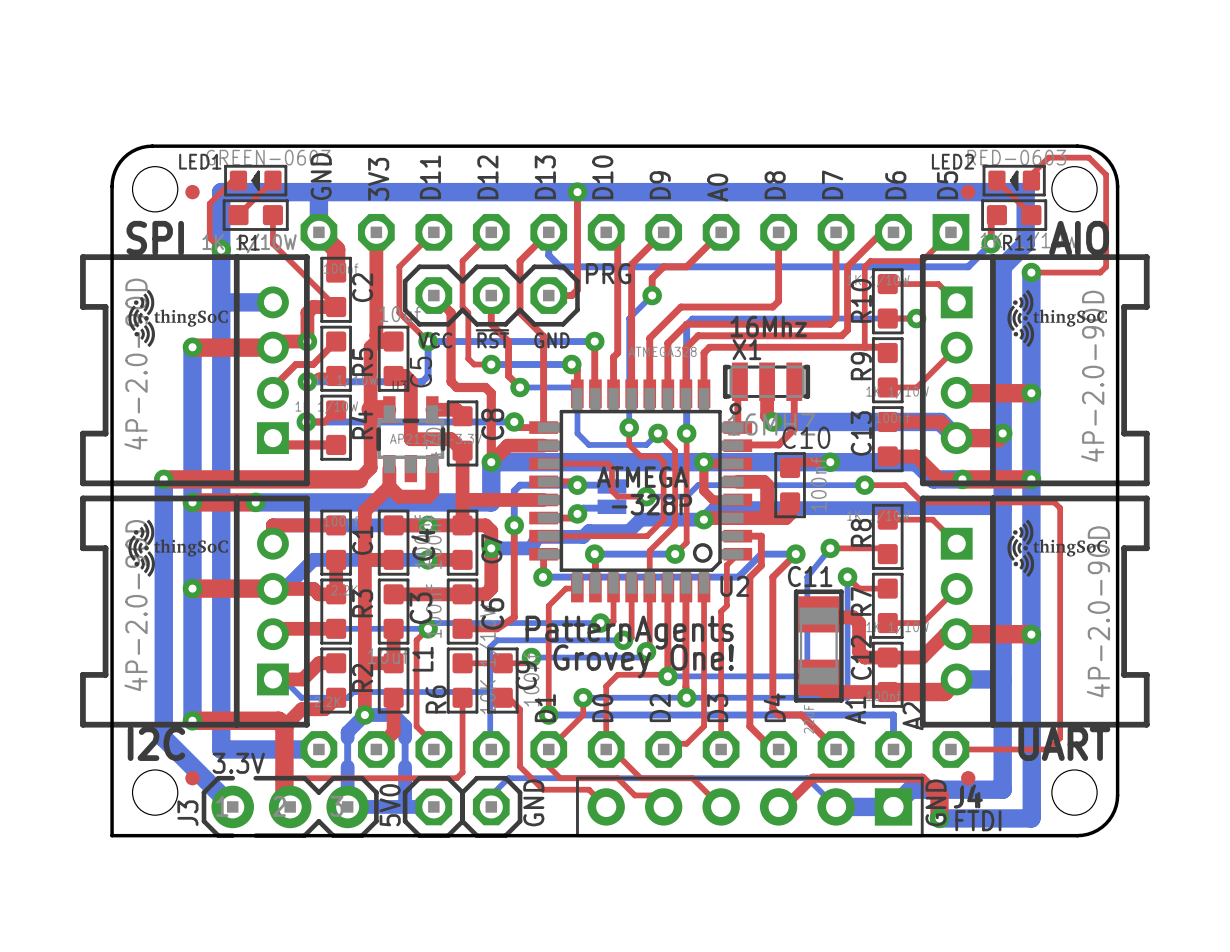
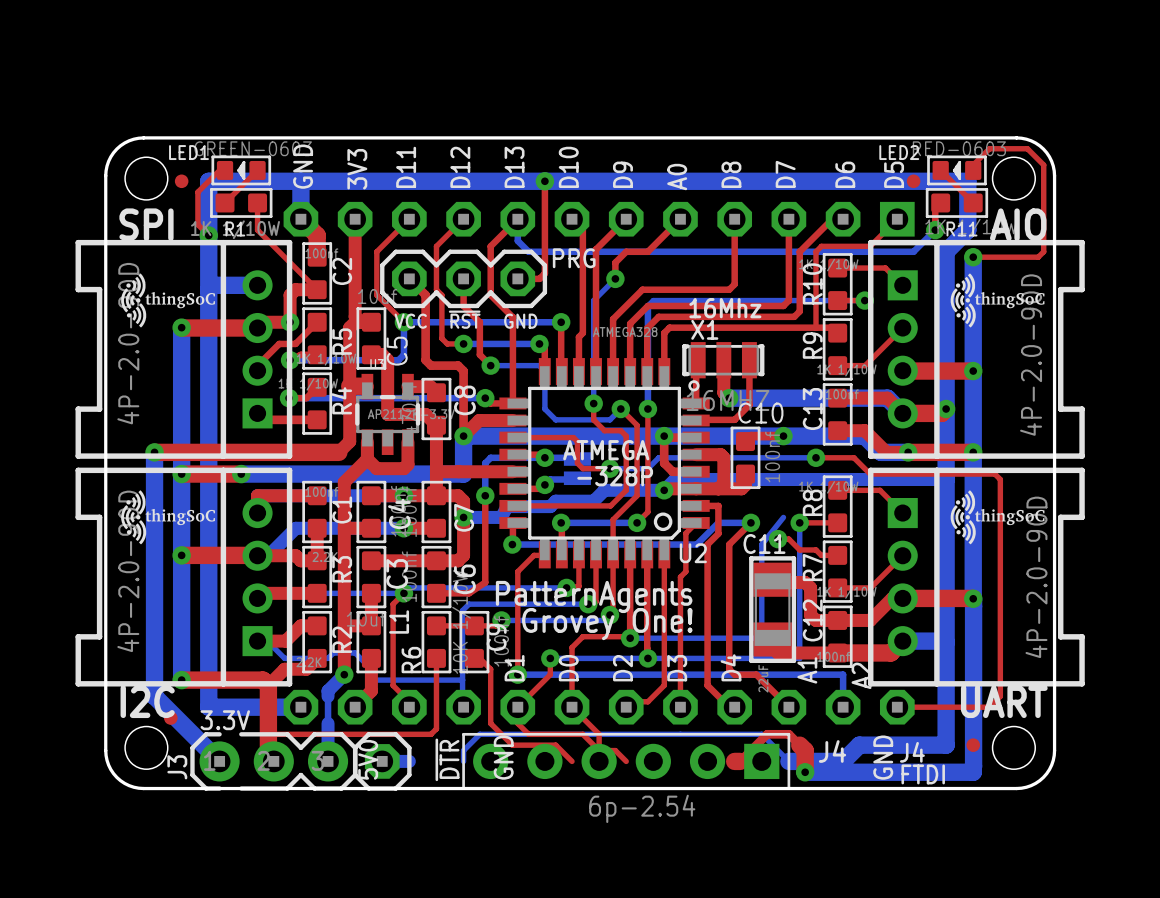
part footprint: [110, 144, 1120, 838] -> [104, 136, 1057, 791]
top track: (830, 548) (882, 548) (887, 554) -> (799, 522) (837, 522)
via position: (830, 548) -> (799, 522)
bottom track: none -> (799, 522) (799, 544)
via: none -> (778, 539)
top track: (847, 577) (859, 588) (870, 588) -> (778, 539) (788, 539) (799, 549) (816, 549) (821, 555)
via: (847, 577) -> none
bottom track: (376, 692) (490, 692) -> (355, 652) (371, 669) (371, 680) (462, 680)
bottom track: (364, 715) (393, 715) (405, 726) (405, 806) (347, 806) -> none
top track: (606, 749) (611, 749) (640, 778) (692, 778) (721, 806) -> (572, 707) (599, 734) (599, 761)
part position: (192, 778) -> (170, 718)
top track: (836, 778) (922, 778) (939, 795) (939, 818) -> (788, 734) (805, 750) (805, 772)
part position: (968, 778) -> (973, 745)
text: none -> ~{DTR} (447, 759)
part position: (433, 806) -> (382, 761)
part: (491, 806) -> none
J4 position: (749, 806) -> (626, 761)
bottom track: none -> (805, 772) (886, 772)
via position: (939, 818) -> (805, 772)
J4 value: none -> 6p-2.54 (642, 808)

